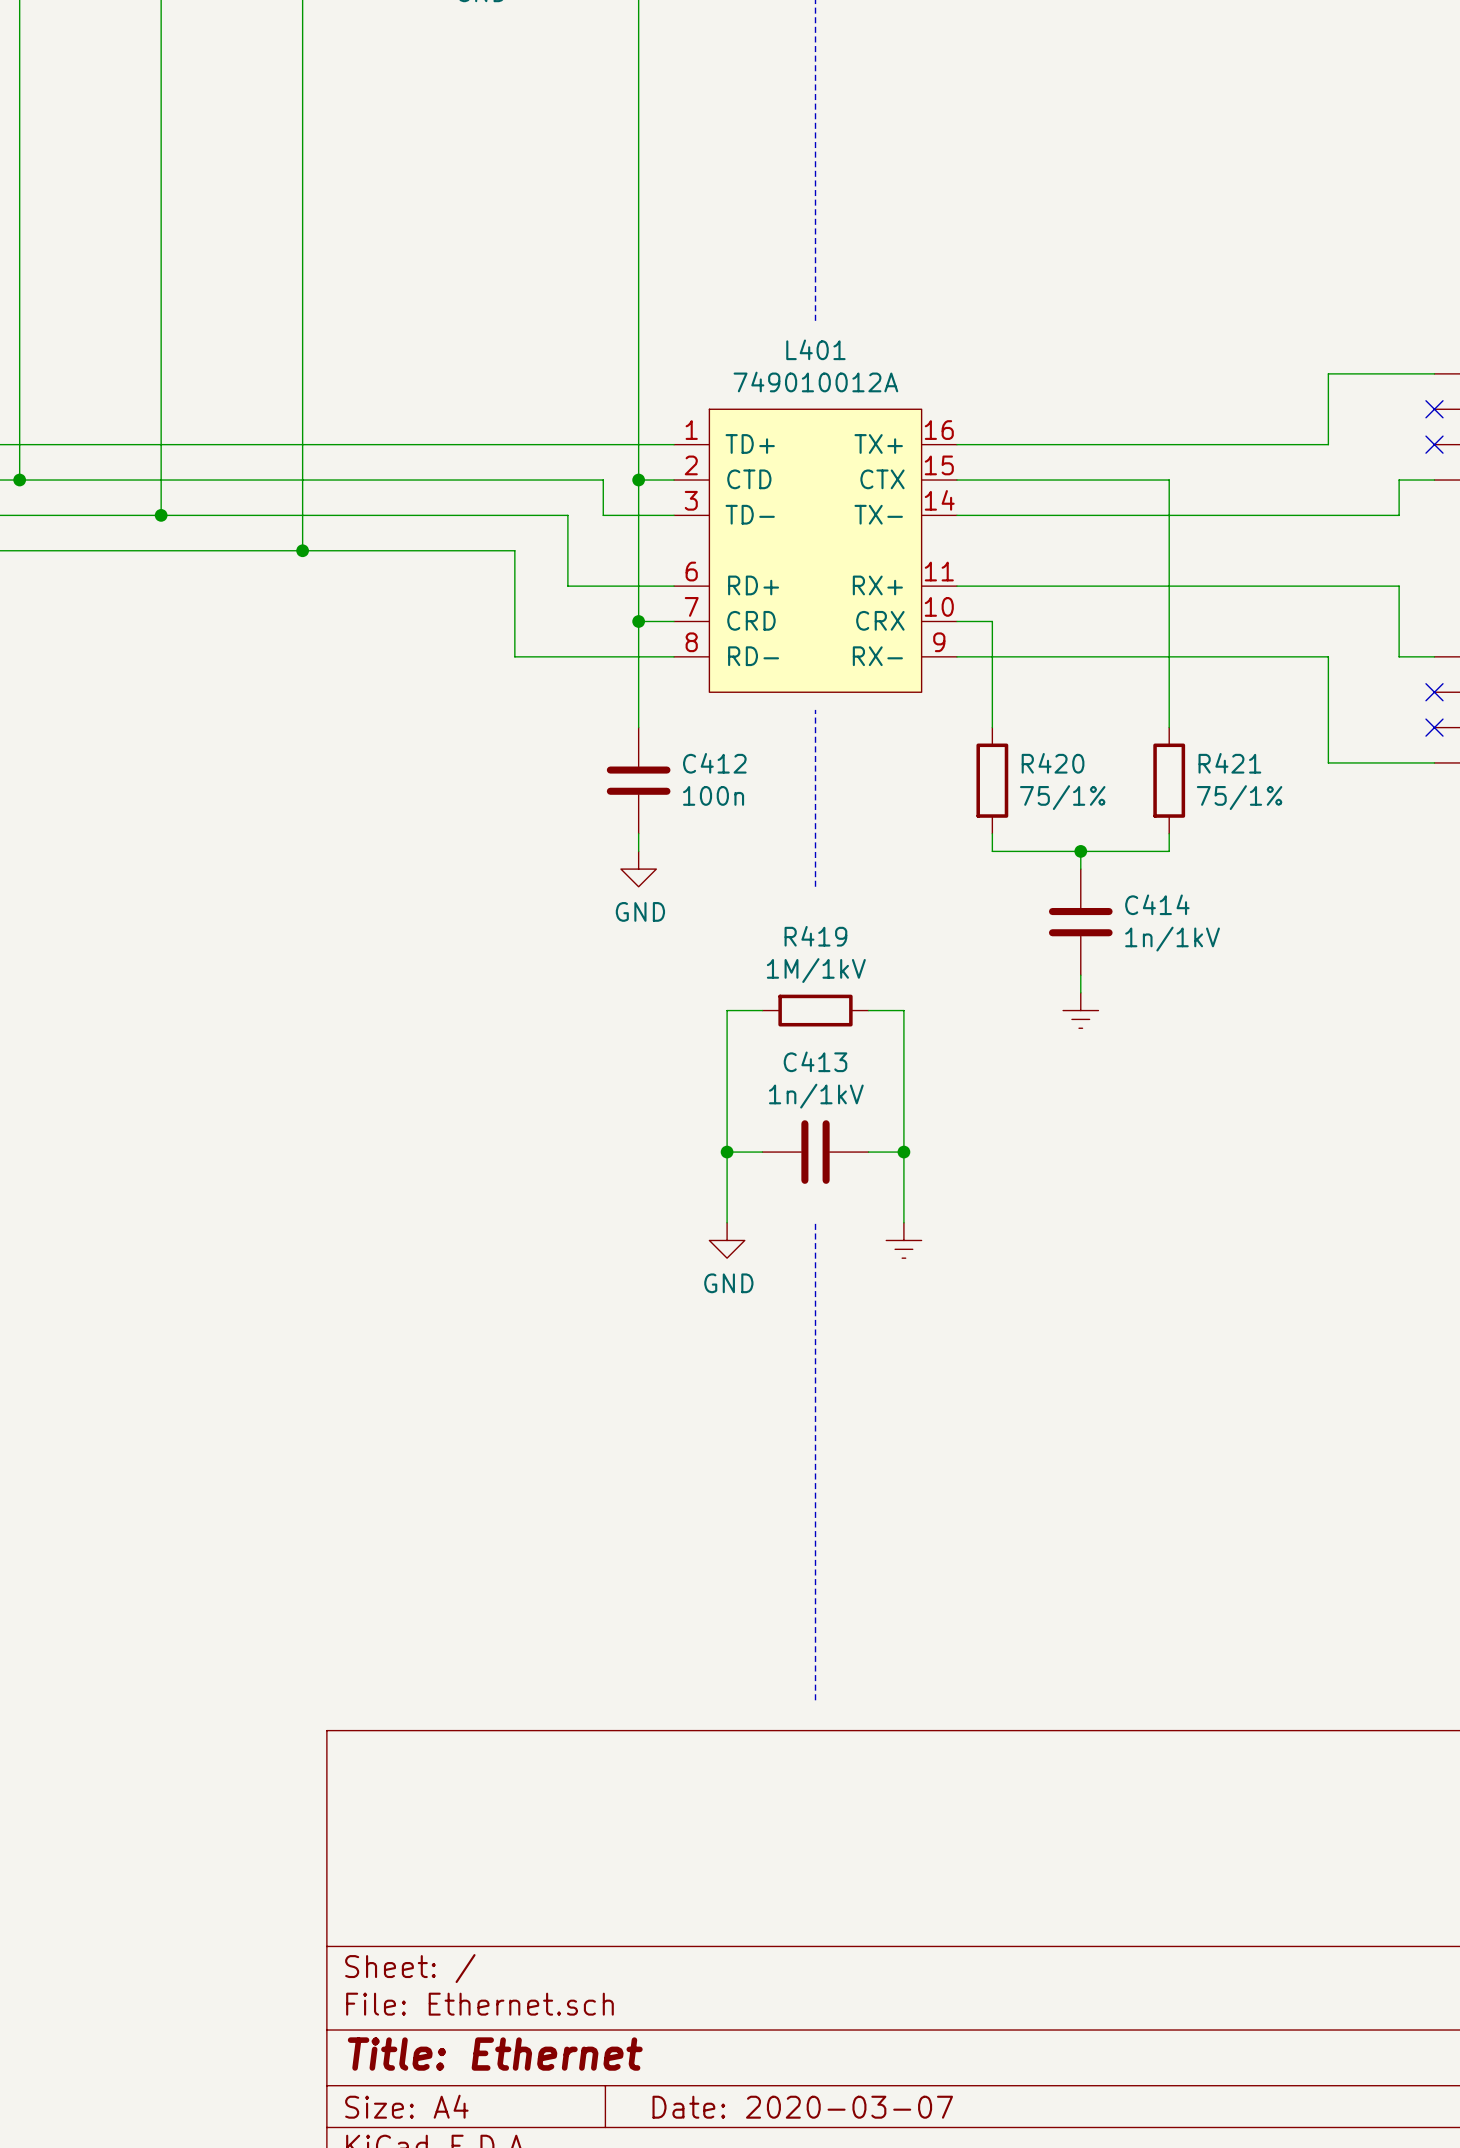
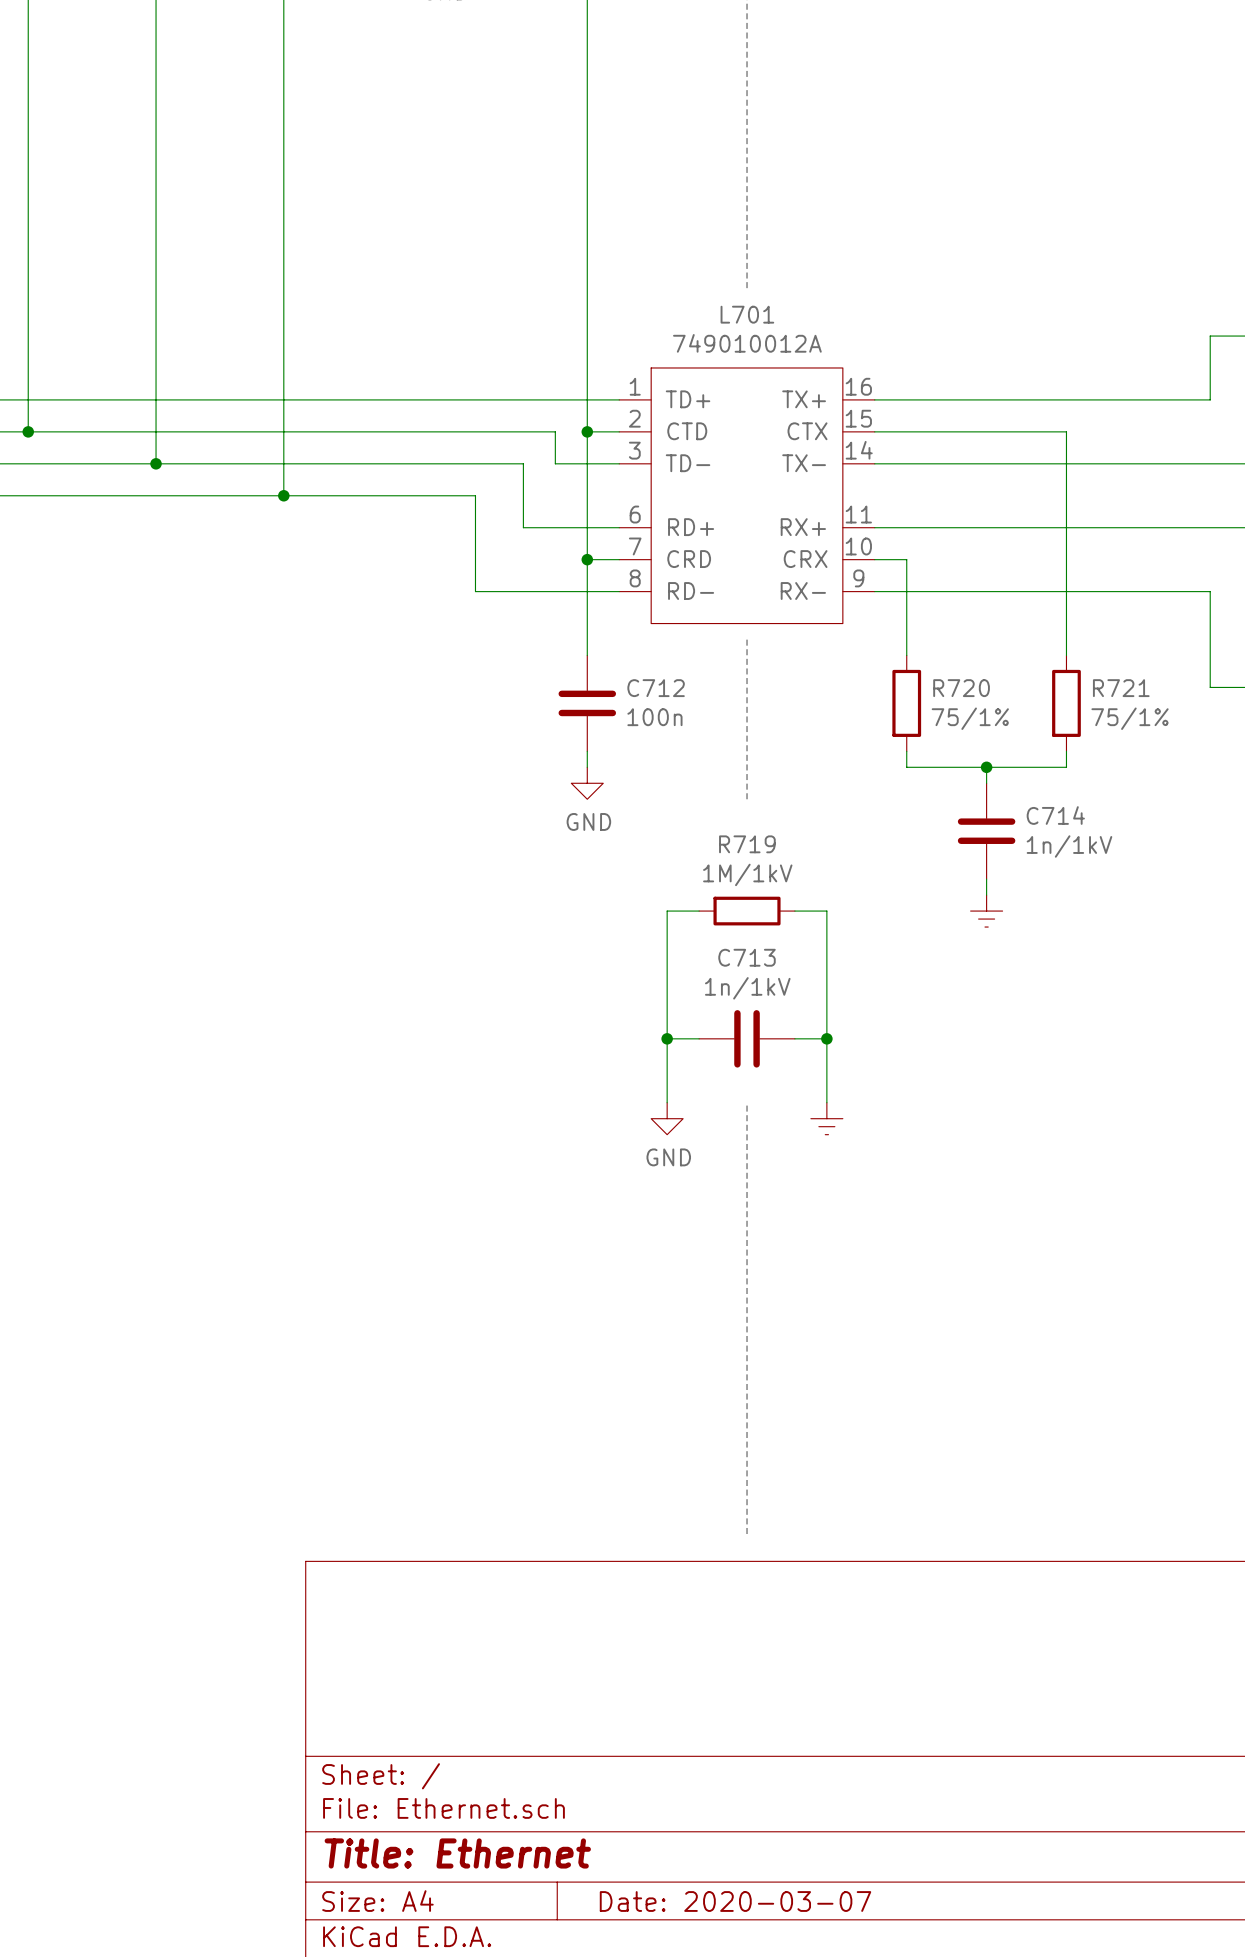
L401 name: L401 (815, 349) -> L701 (747, 314)
C412 name: C412 (714, 763) -> C712 (656, 688)
R420 name: R420 (1053, 763) -> R720 (961, 688)
R421 name: R421 (1229, 763) -> R721 (1121, 688)
C414 name: C414 (1157, 904) -> C714 (1055, 815)
R419 name: R419 (815, 936) -> R719 (747, 844)
C413 name: C413 (815, 1061) -> C713 (747, 957)

